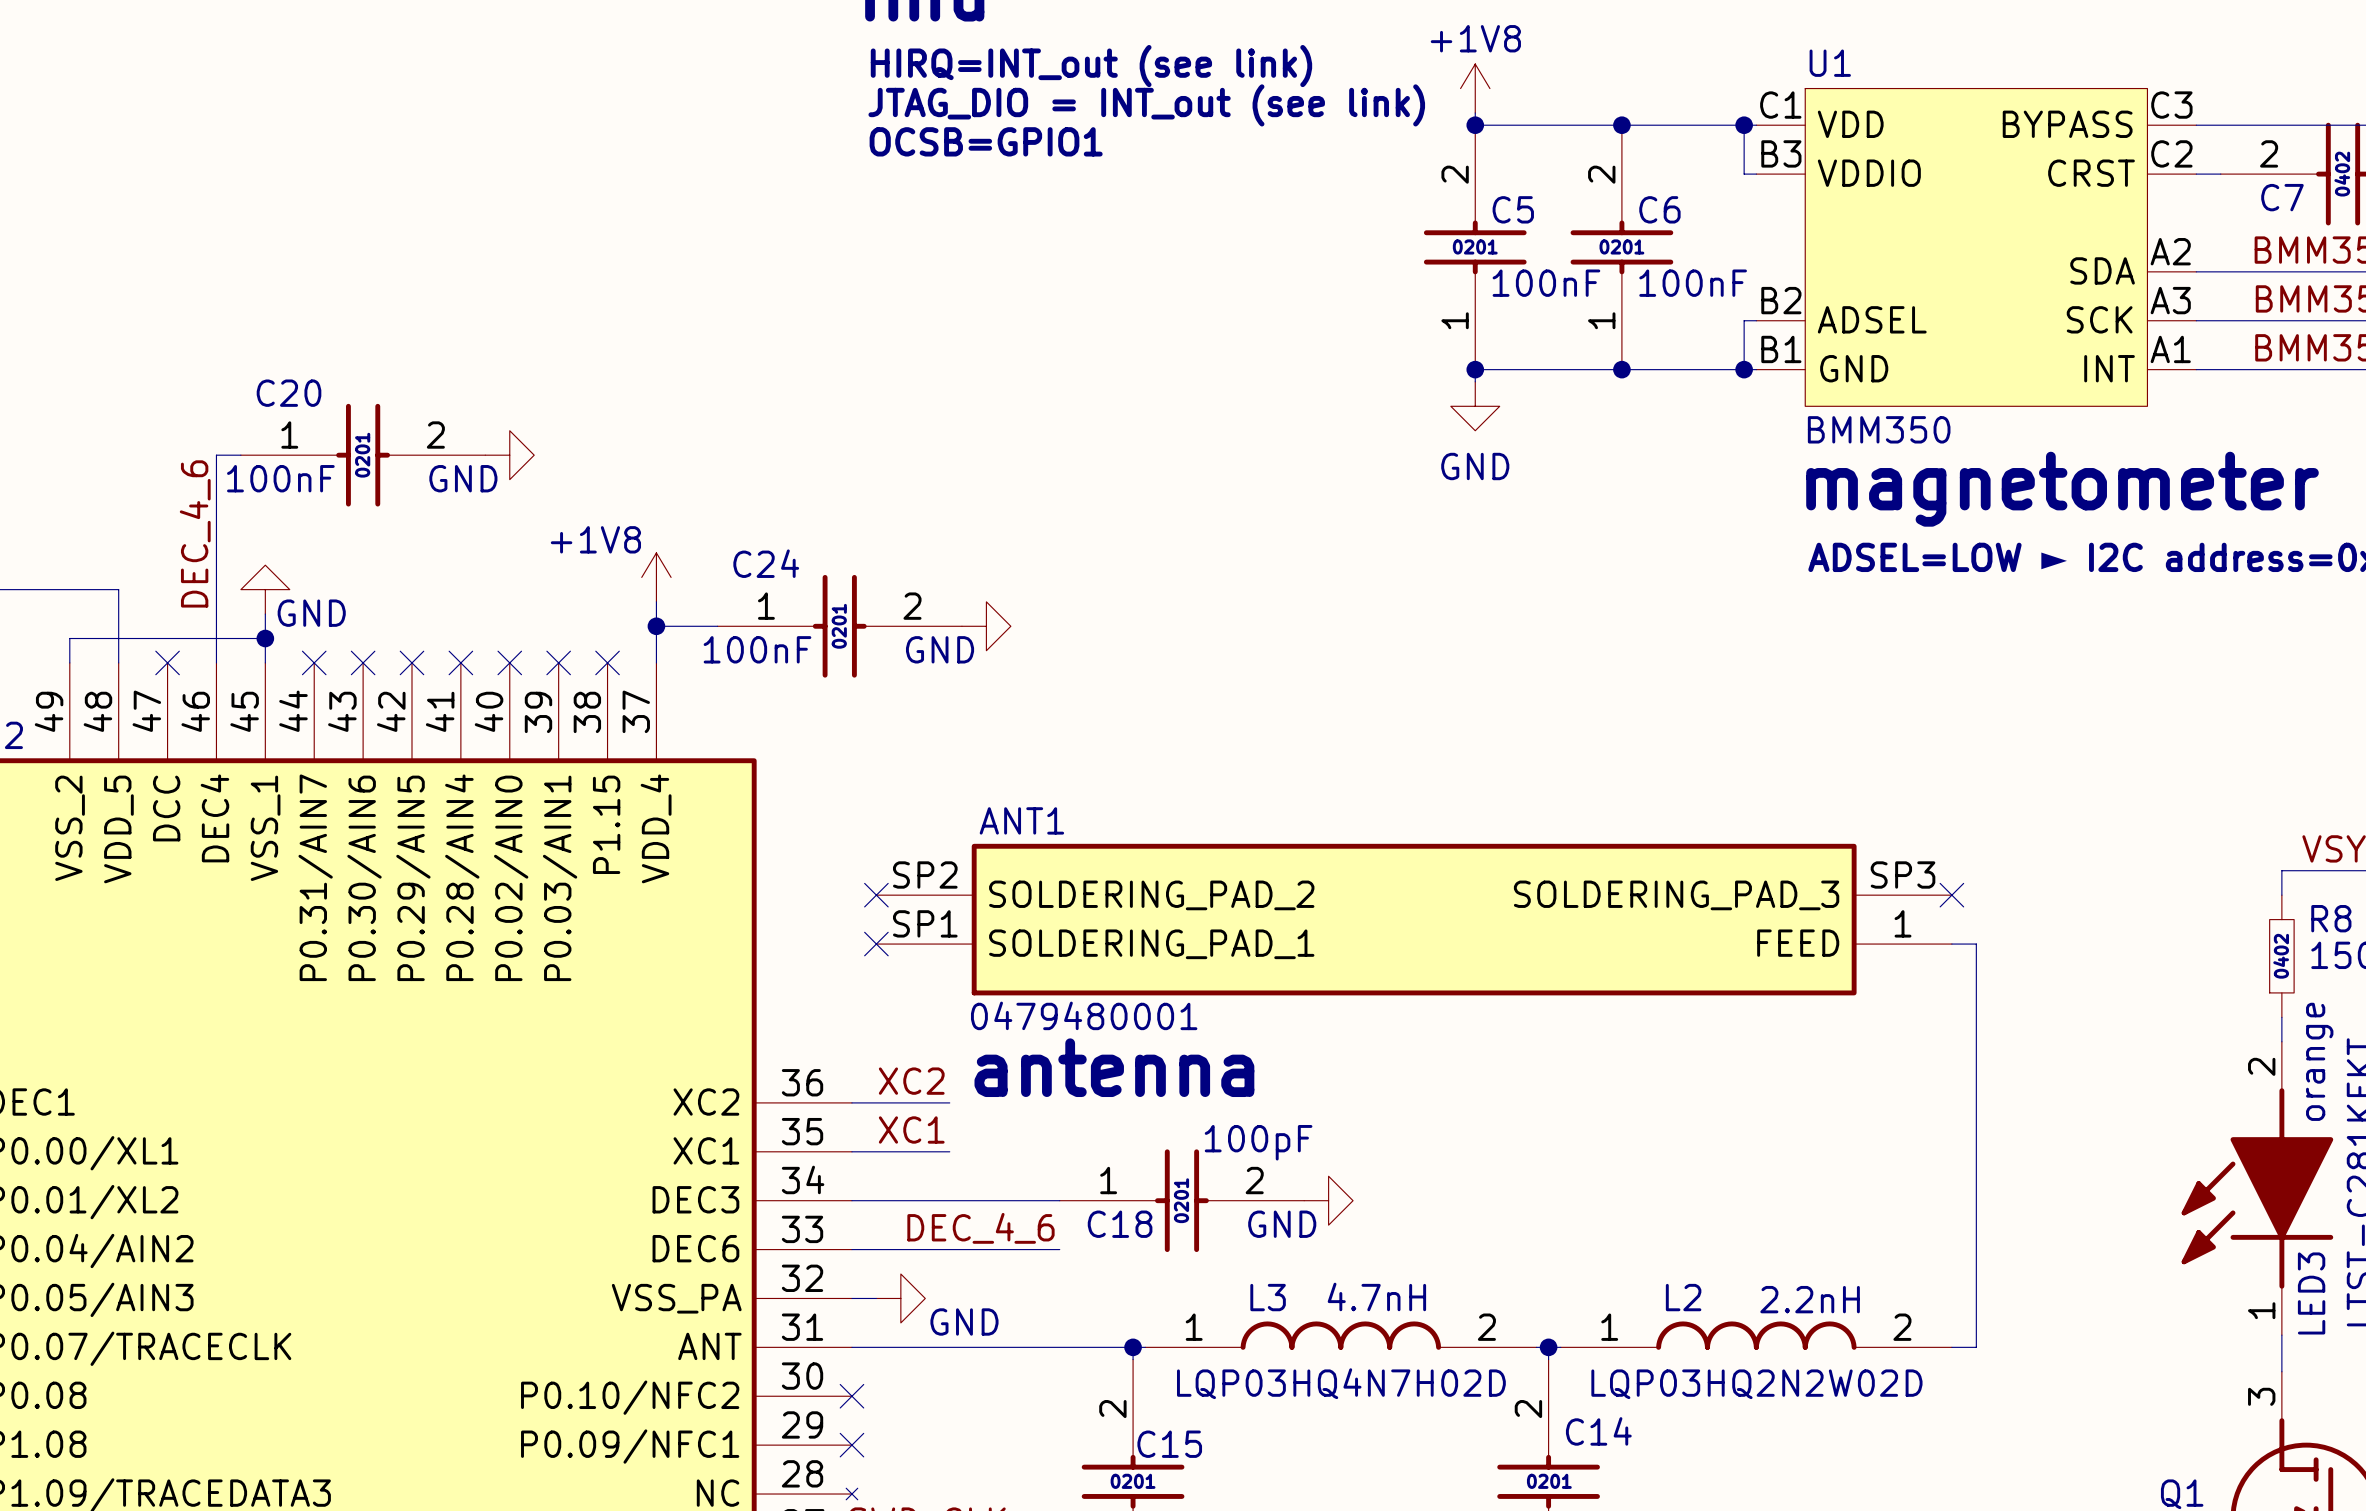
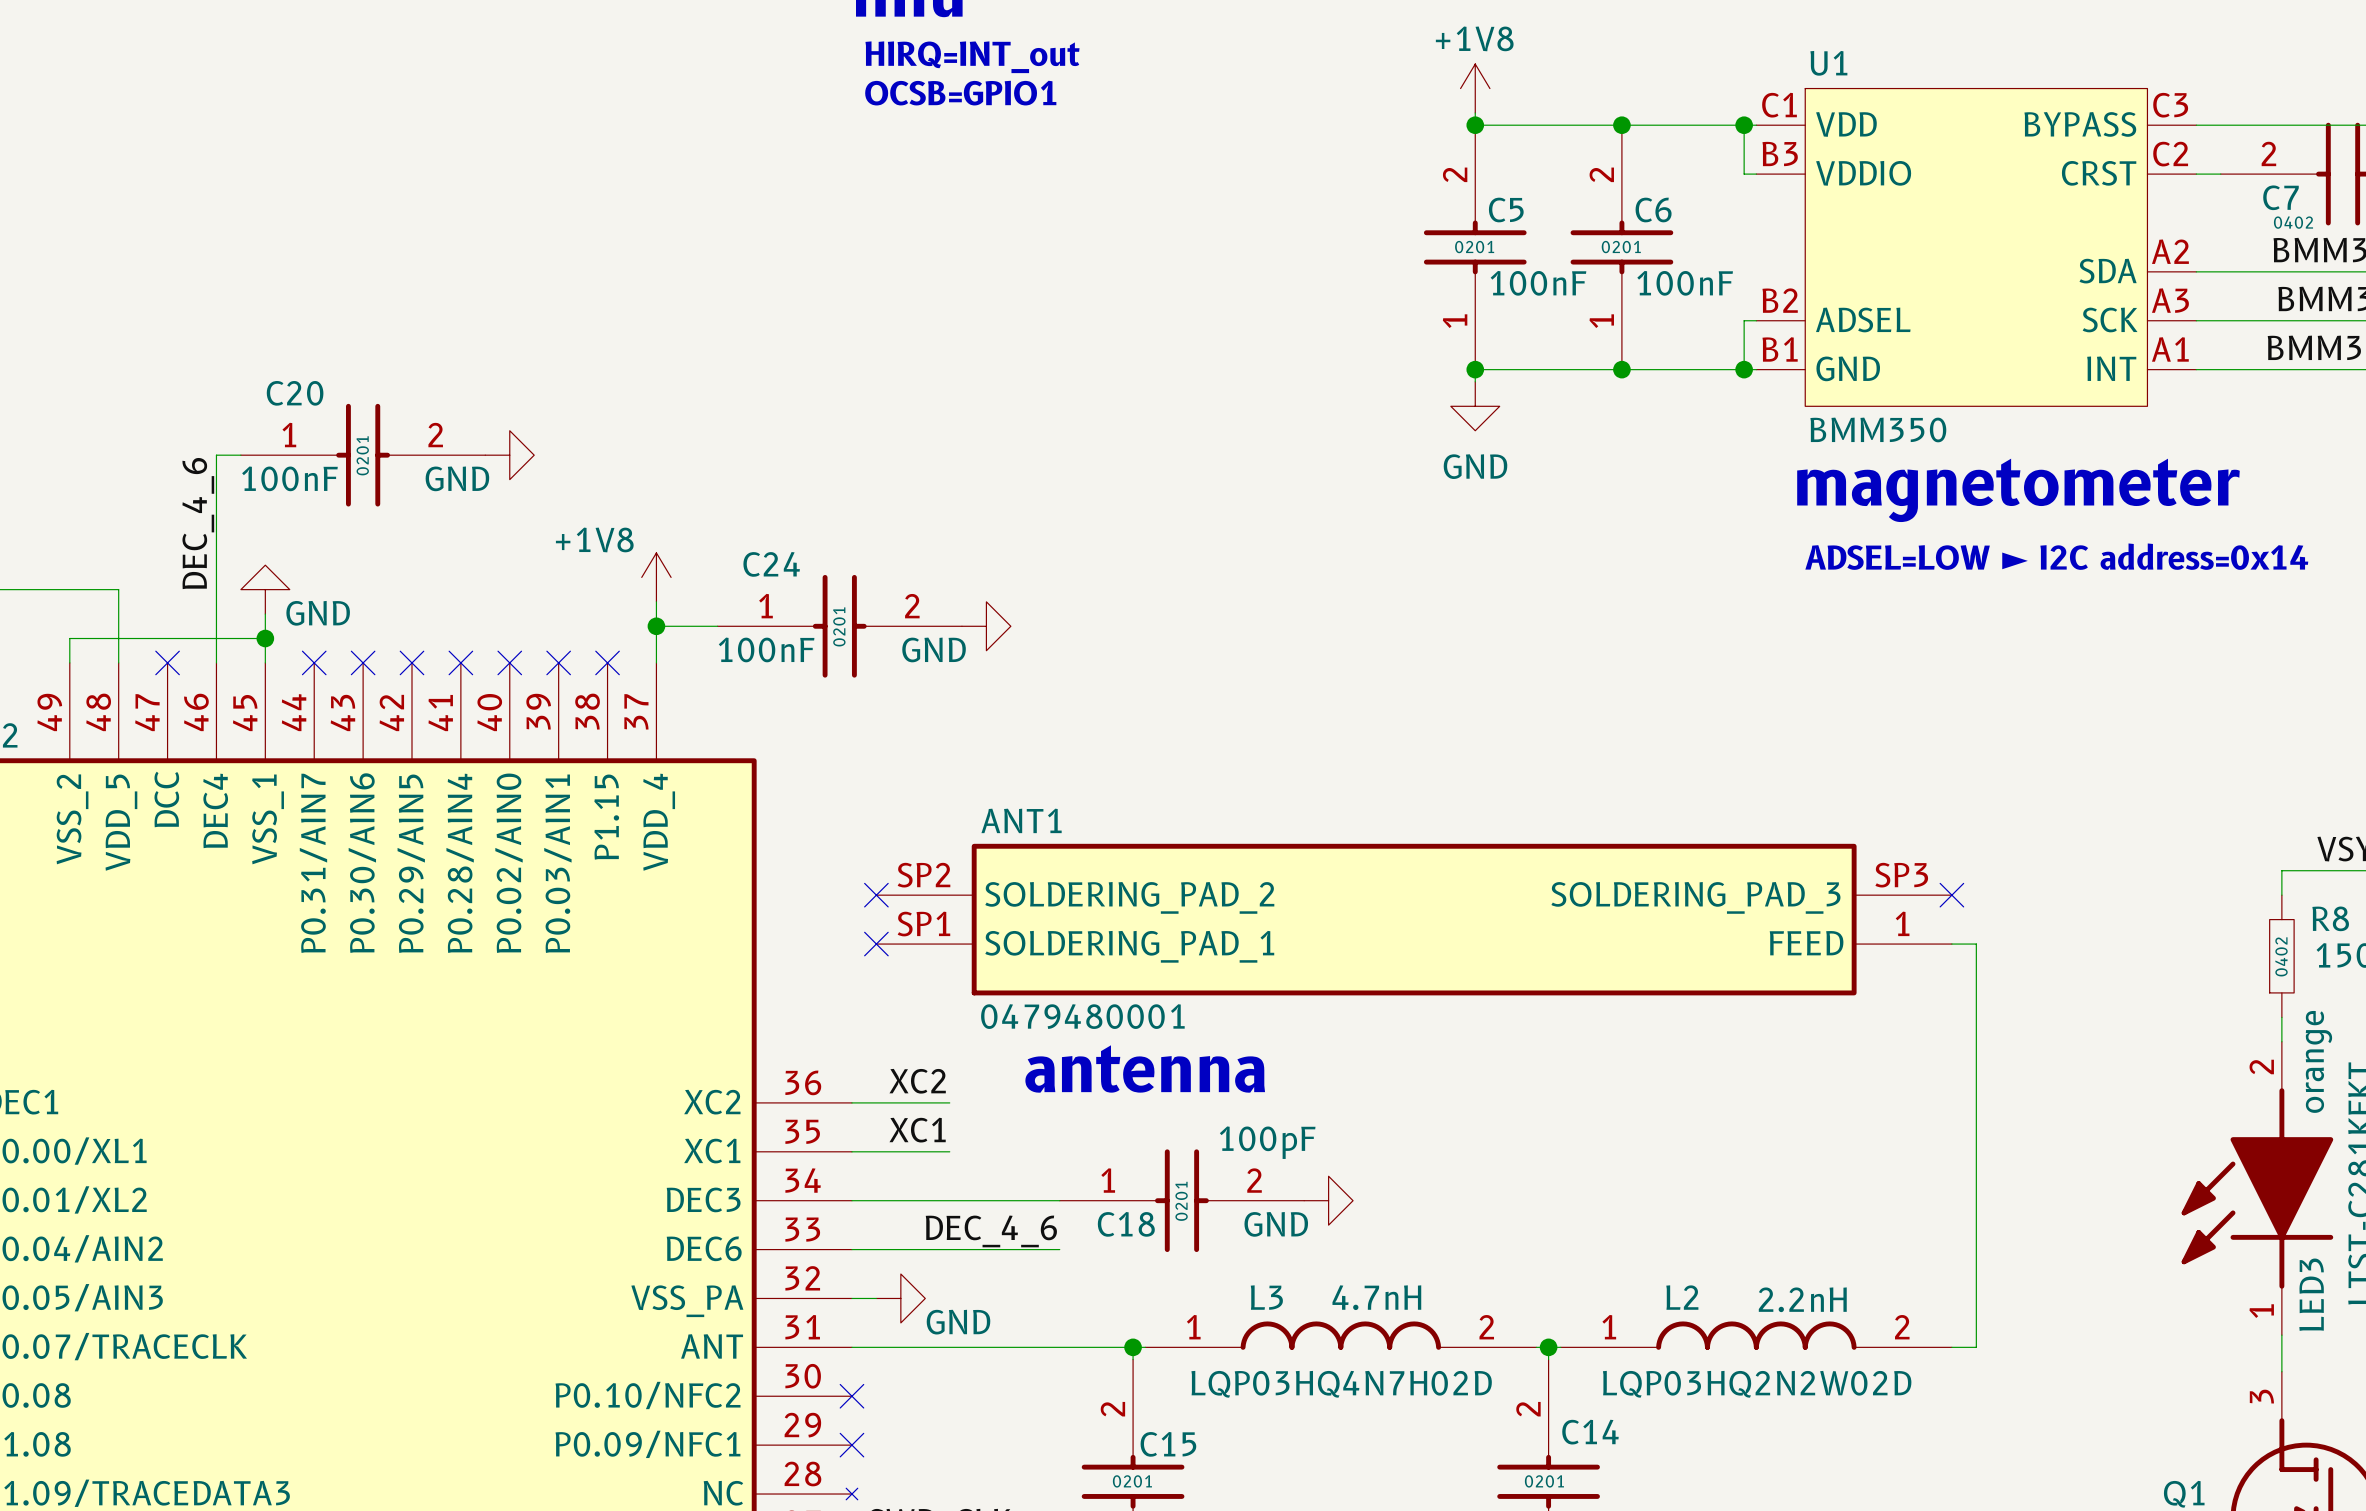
text: HIRQ=INT_out (see link) (1091, 66) -> HIRQ=INT_out (972, 57)
text: JTAG_DIO = INT_out (see link) (1146, 105) -> OCSB=GPIO1 (960, 93)
text: OCSB=GPIO1 (986, 141) -> none
C7 text rotation: 0° (2342, 174) -> 90° clockwise (2293, 222)
C7 text position: 0402 (2342, 174) -> 0402 (2293, 222)

